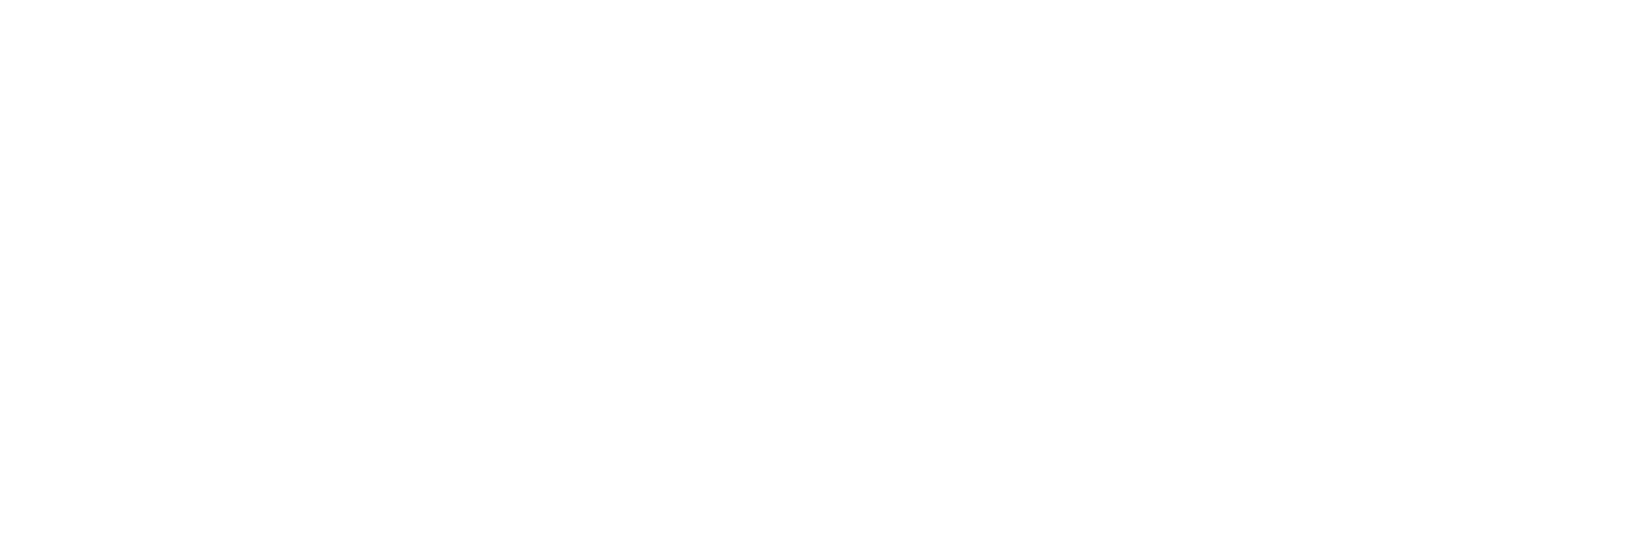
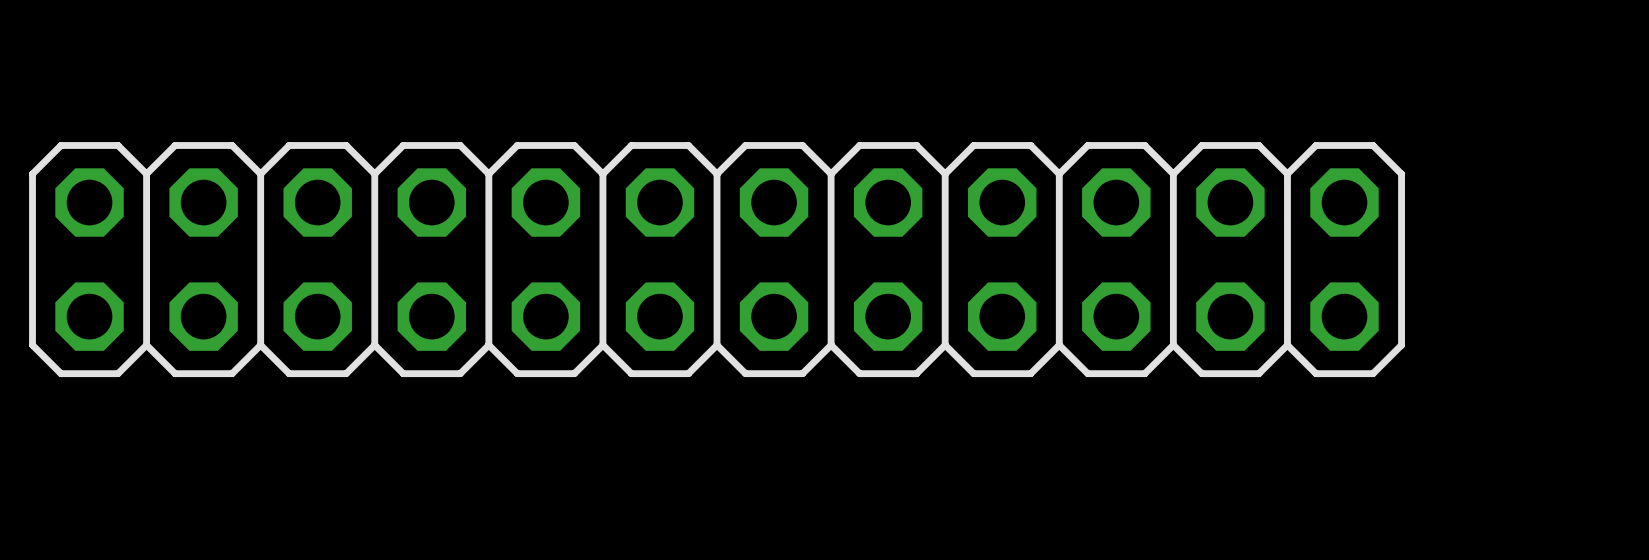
part: none -> (717, 259)

